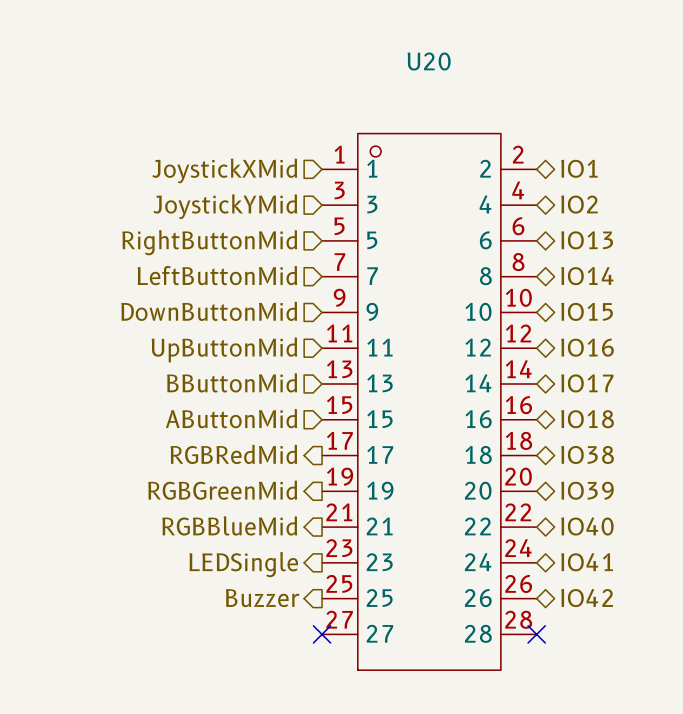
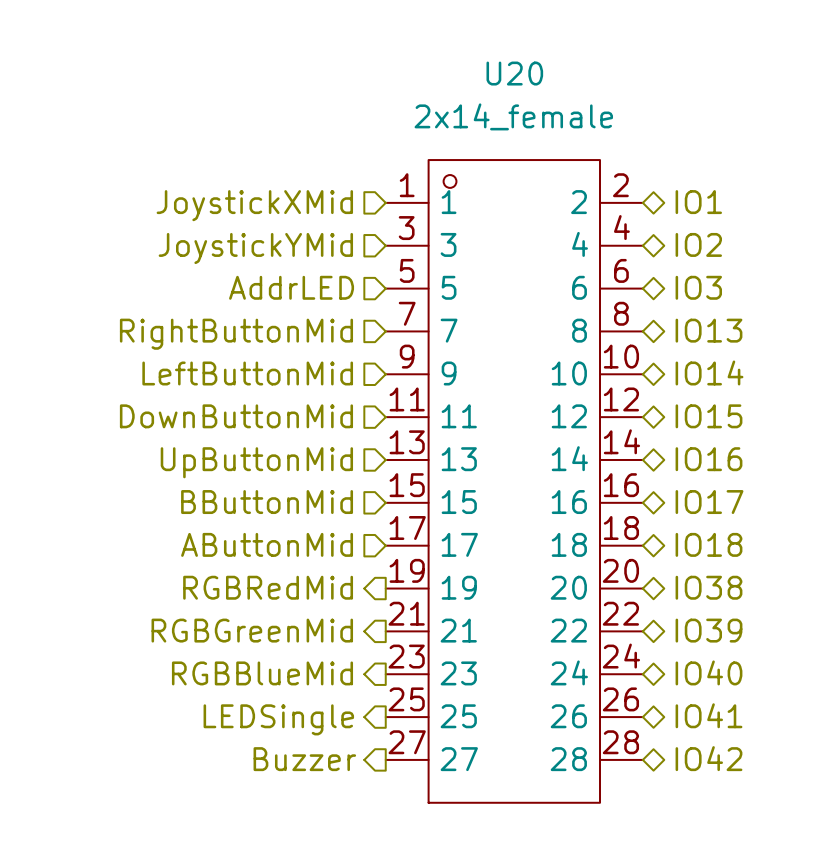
U20 value: none -> 2x14_female (513, 116)
hierarchical label: IO13 (587, 240) -> IO3 (698, 287)
hierarchical label: RightButtonMid (209, 242) -> AddrLED (291, 287)
hierarchical label: LeftButtonMid (217, 275) -> RightButtonMid (236, 334)
hierarchical label: IO14 (587, 276) -> IO13 (708, 330)
hierarchical label: DownButtonMid (209, 311) -> LeftButtonMid (247, 373)
hierarchical label: IO15 (587, 311) -> IO14 (709, 372)
hierarchical label: IO16 (587, 347) -> IO15 (708, 416)
hierarchical label: UpButtonMid (224, 349) -> DownButtonMid (236, 416)
hierarchical label: BButtonMid (232, 382) -> UpButtonMid (256, 462)
hierarchical label: IO17 (587, 383) -> IO16 (708, 459)
hierarchical label: AButtonMid (231, 418) -> BButtonMid (267, 502)
hierarchical label: IO18 (587, 419) -> IO17 (709, 502)
hierarchical label shape: output (233, 454) -> input (267, 544)
hierarchical label: RGBRedMid (233, 454) -> AButtonMid (267, 544)
hierarchical label: IO38 (587, 454) -> IO18 (708, 544)
hierarchical label: RGBGreenMid (222, 490) -> RGBRedMid (268, 587)
hierarchical label: IO39 (587, 490) -> IO38 (708, 587)
hierarchical label: RGBBlueMid (229, 525) -> RGBGreenMid (252, 630)
hierarchical label: IO40 (587, 526) -> IO39 (708, 630)
hierarchical label: IO41 (587, 562) -> IO40 (708, 672)
hierarchical label: LEDSingle (243, 564) -> RGBBlueMid (262, 673)
hierarchical label: Buzzer (262, 598) -> LEDSingle (278, 719)
hierarchical label: IO42 (587, 598) -> IO41 (708, 715)
hierarchical label: none -> Buzzer (304, 759)
hierarchical label: none -> IO42 (708, 758)
no-connect mark: (322, 634) -> none
no-connect mark: (536, 634) -> none

